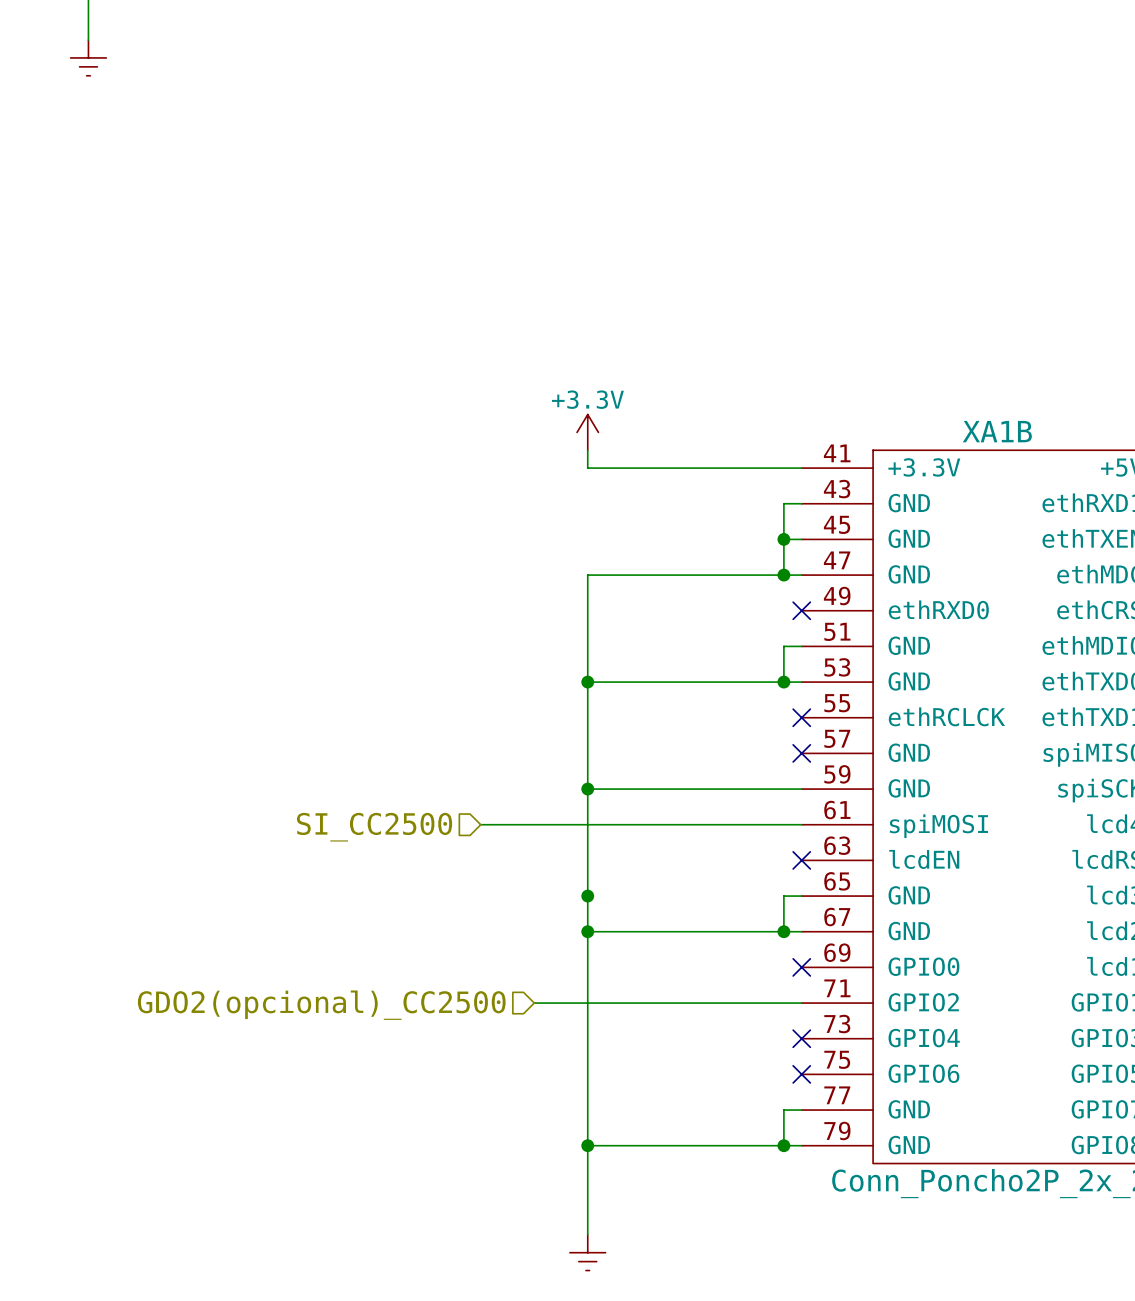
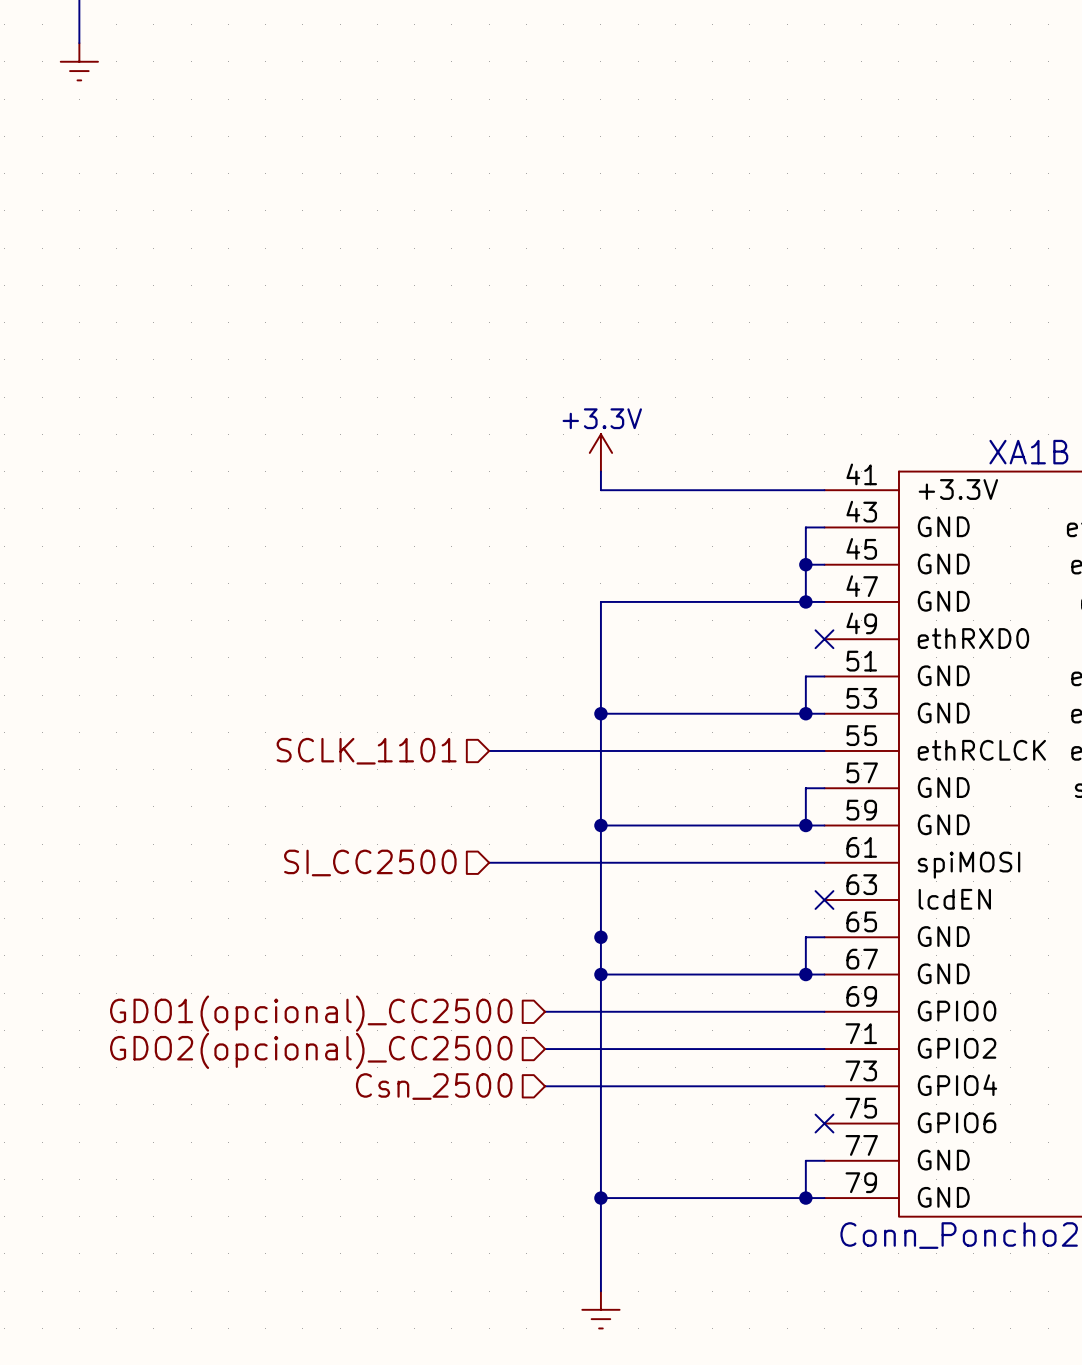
wire: none -> (489, 750) (824, 750)
no-connect mark: (801, 717) -> none
hierarchical label: none -> SCLK_1101 (366, 751)
wire: none -> (824, 788) (805, 788) (805, 825)
no-connect mark: (801, 753) -> none
junction: none -> (805, 825)
wire: none -> (545, 1011) (824, 1011)
no-connect mark: (801, 967) -> none
hierarchical label: none -> GDO1(opcional)_CC2500 (311, 1013)
wire: none -> (545, 1086) (824, 1086)
no-connect mark: (801, 1038) -> none
hierarchical label: none -> Csn_2500 (434, 1086)

